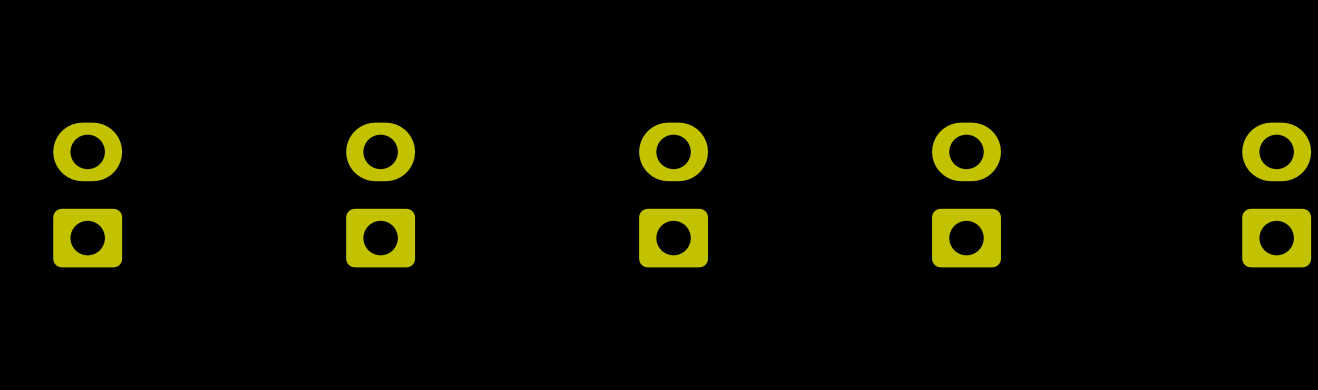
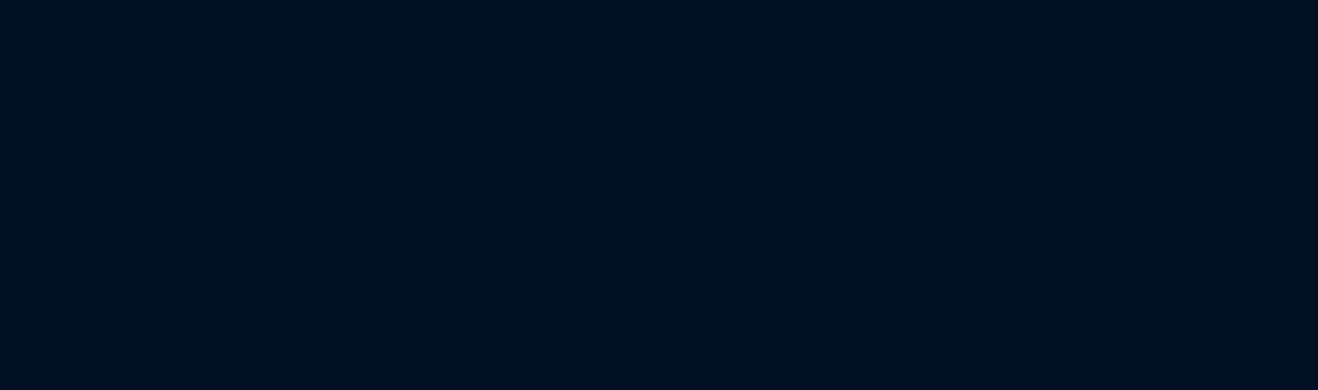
part: (87, 195) -> none
part: (380, 195) -> none
part: (673, 195) -> none
part: (966, 195) -> none
part: (1276, 195) -> none

